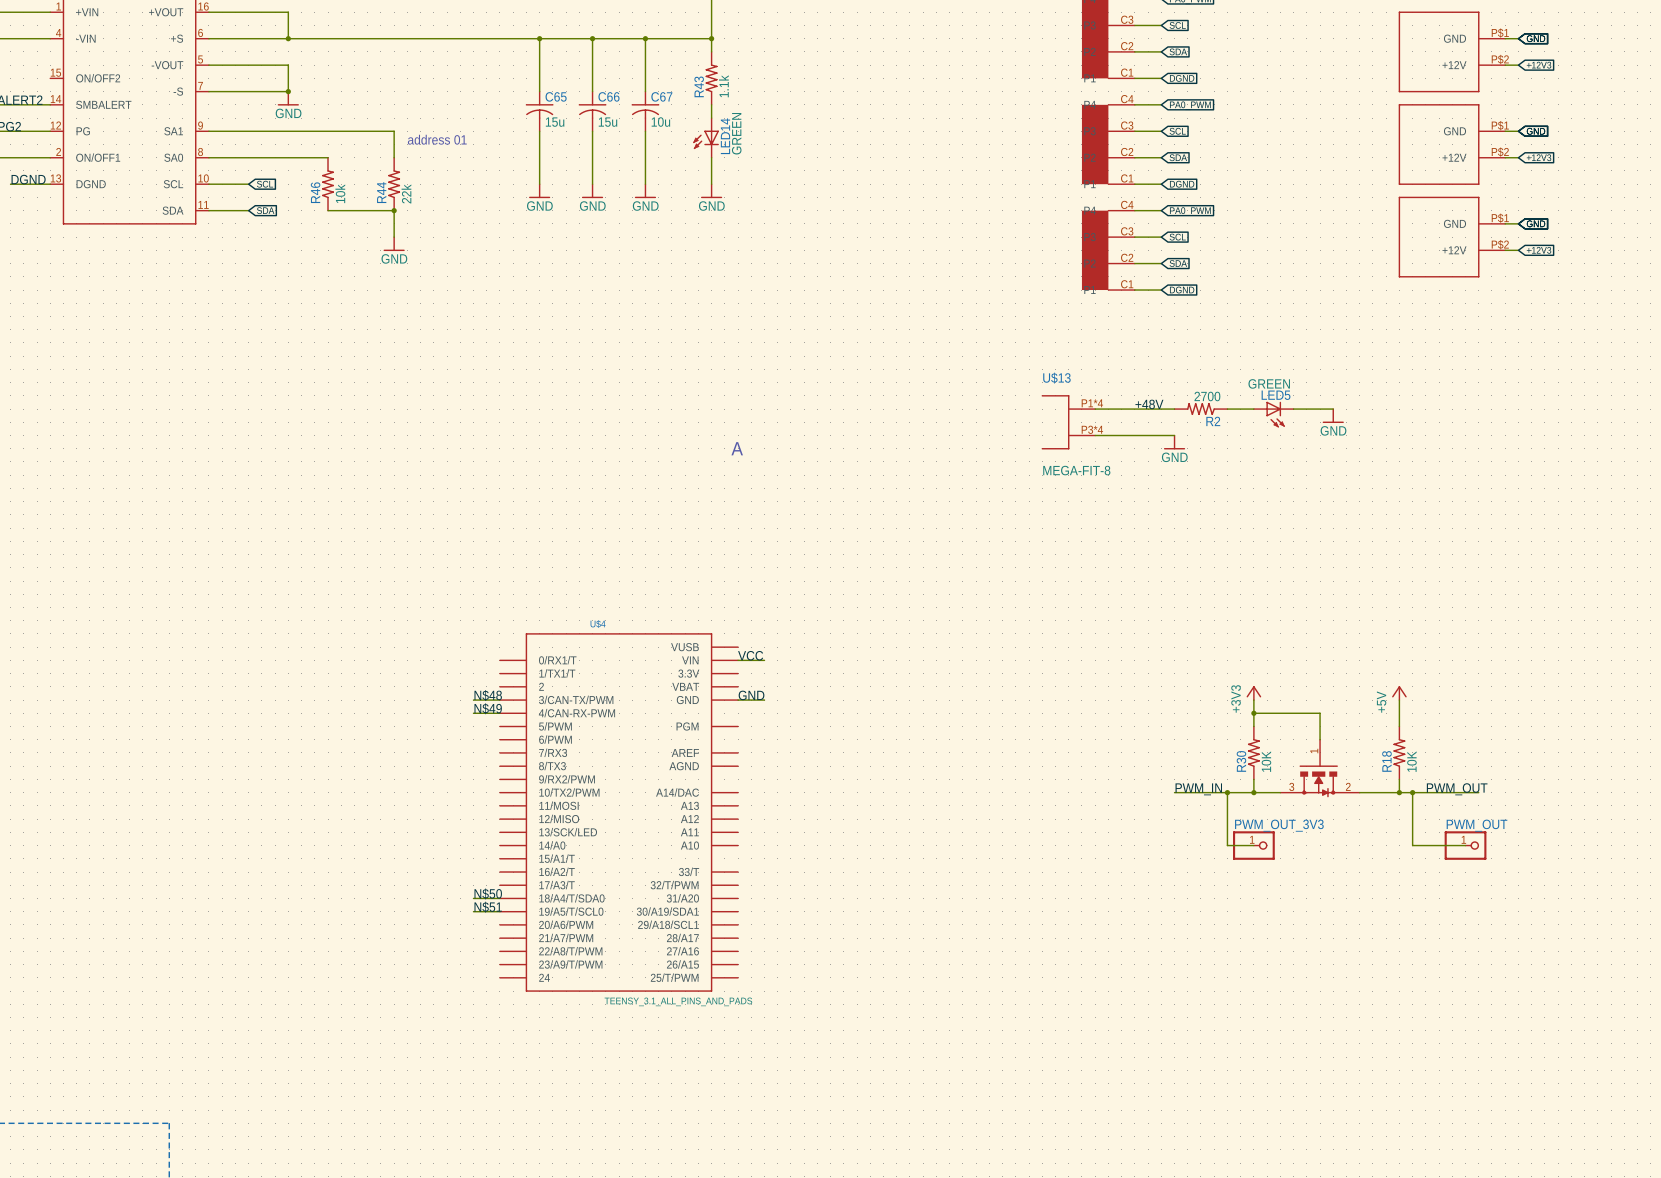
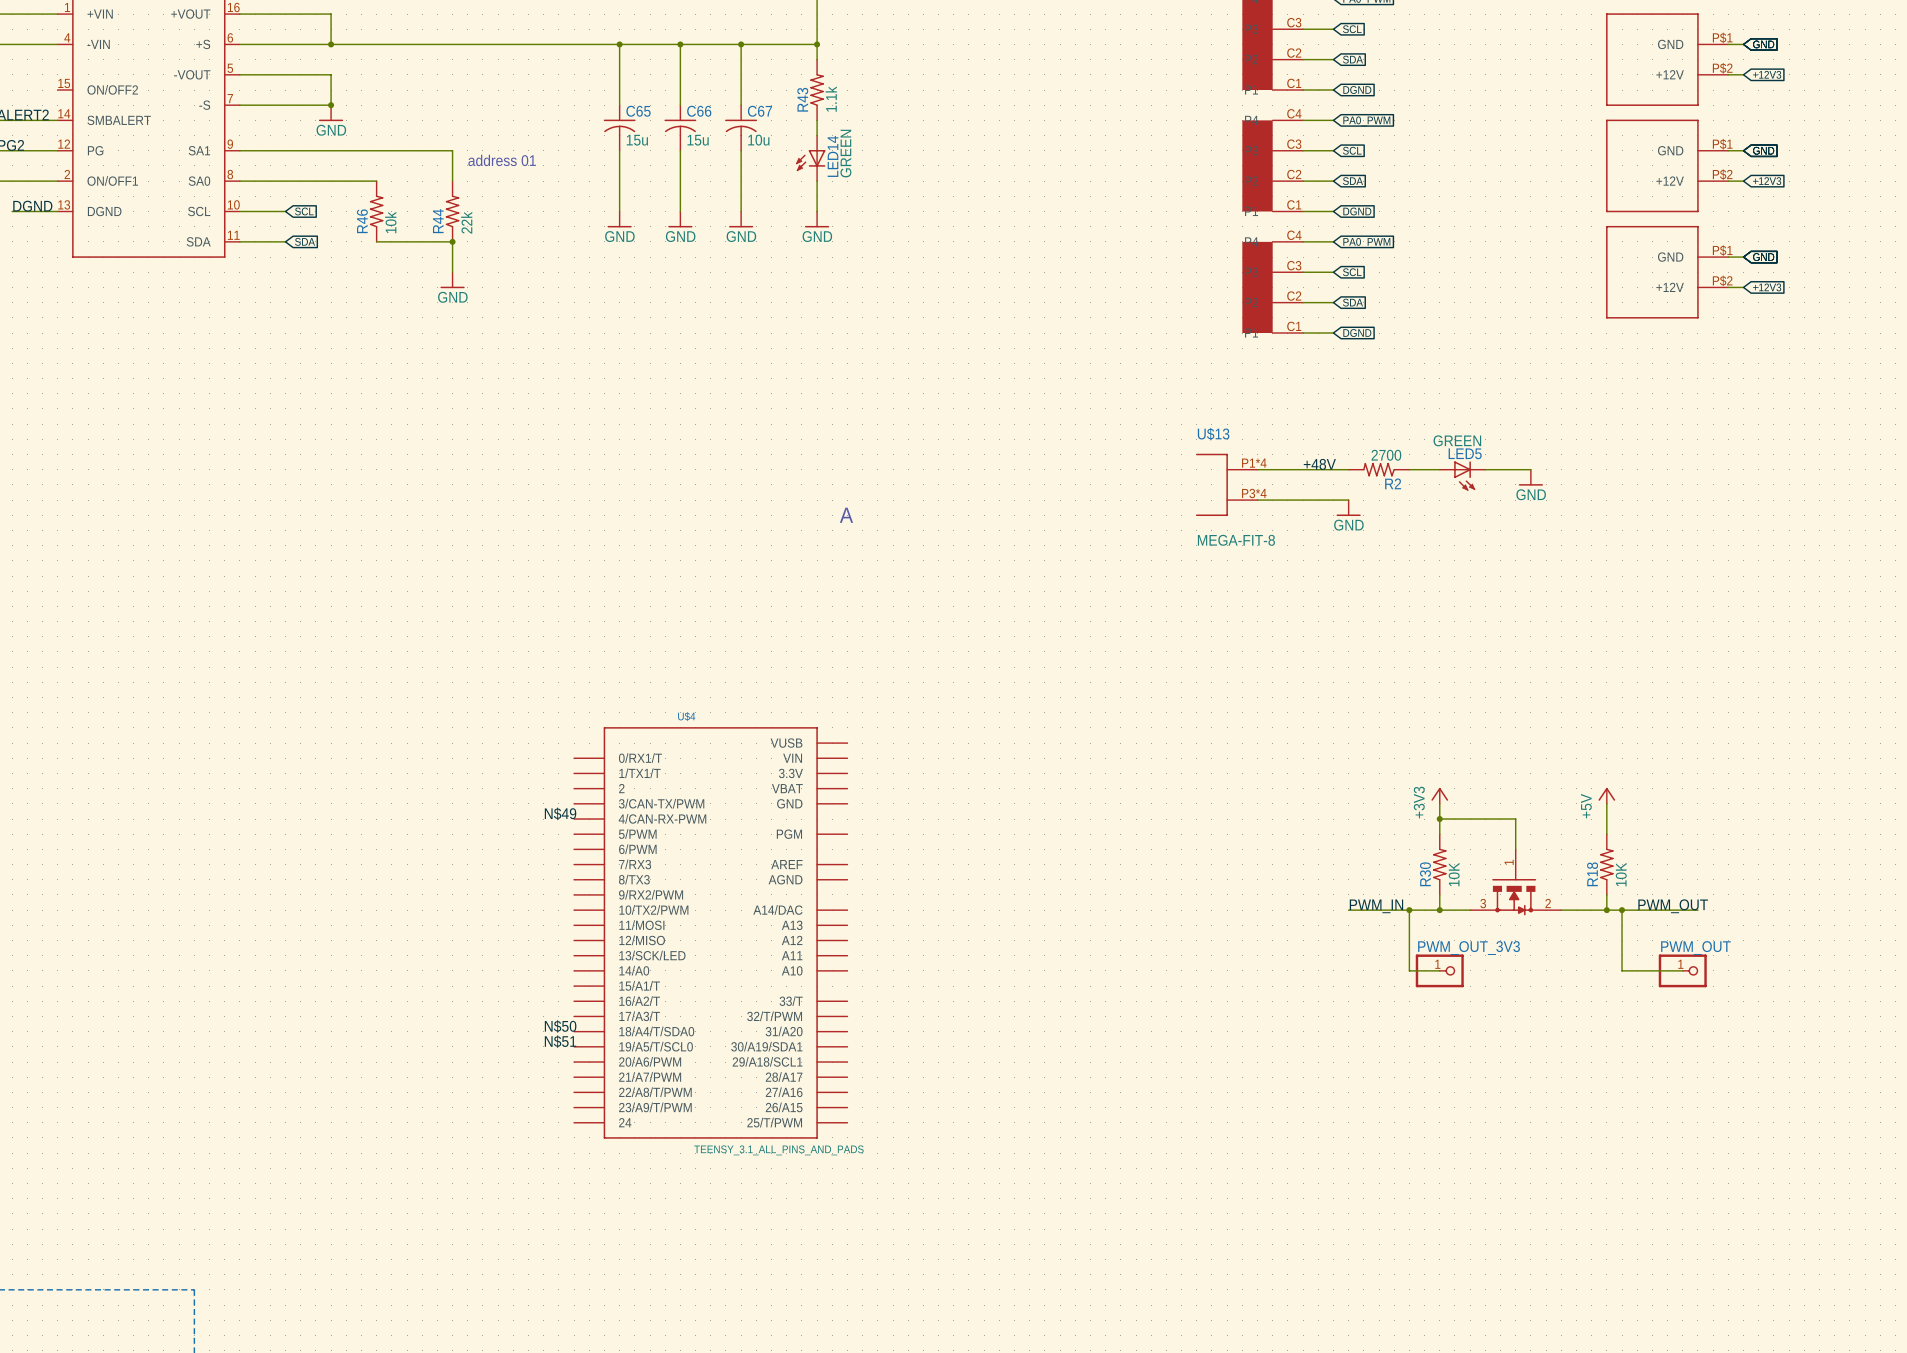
label: VCC (750, 655) -> none
wire: (738, 660) (764, 660) -> none
label: N$48 (488, 695) -> none
label: GND (751, 695) -> none
wire: (473, 700) (499, 700) -> none
wire: (738, 700) (764, 700) -> none
wire: (473, 713) (499, 713) -> none
wire: (473, 898) (499, 898) -> none
wire: (473, 911) (499, 911) -> none

